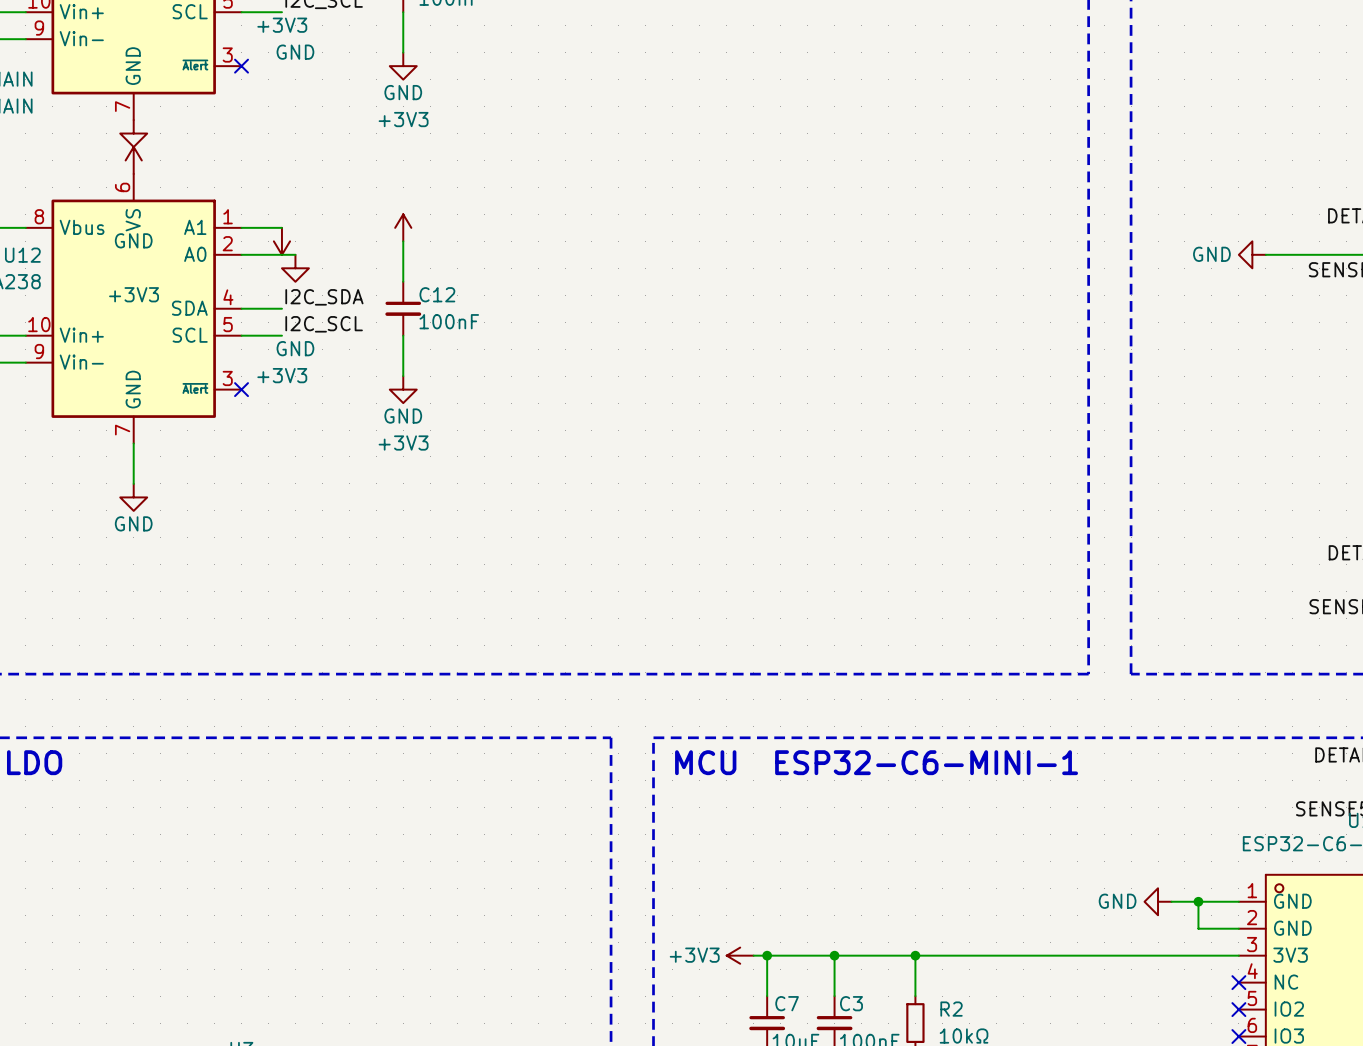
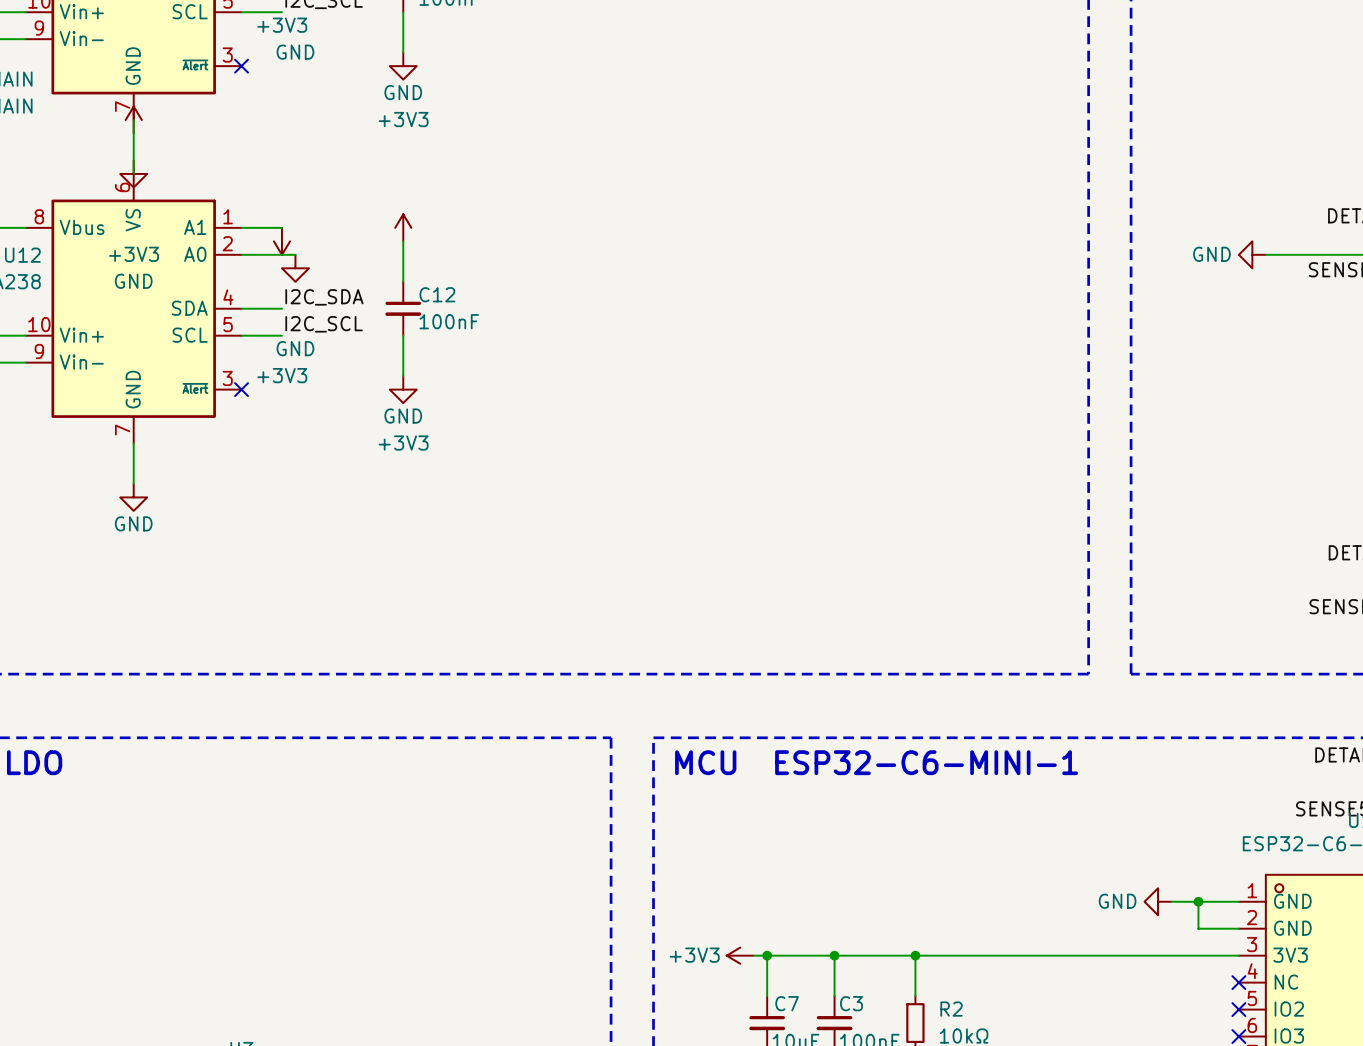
power symbol position: GND (133, 133) -> GND (133, 173)
power symbol position: +3V3 (133, 160) -> +3V3 (133, 120)

